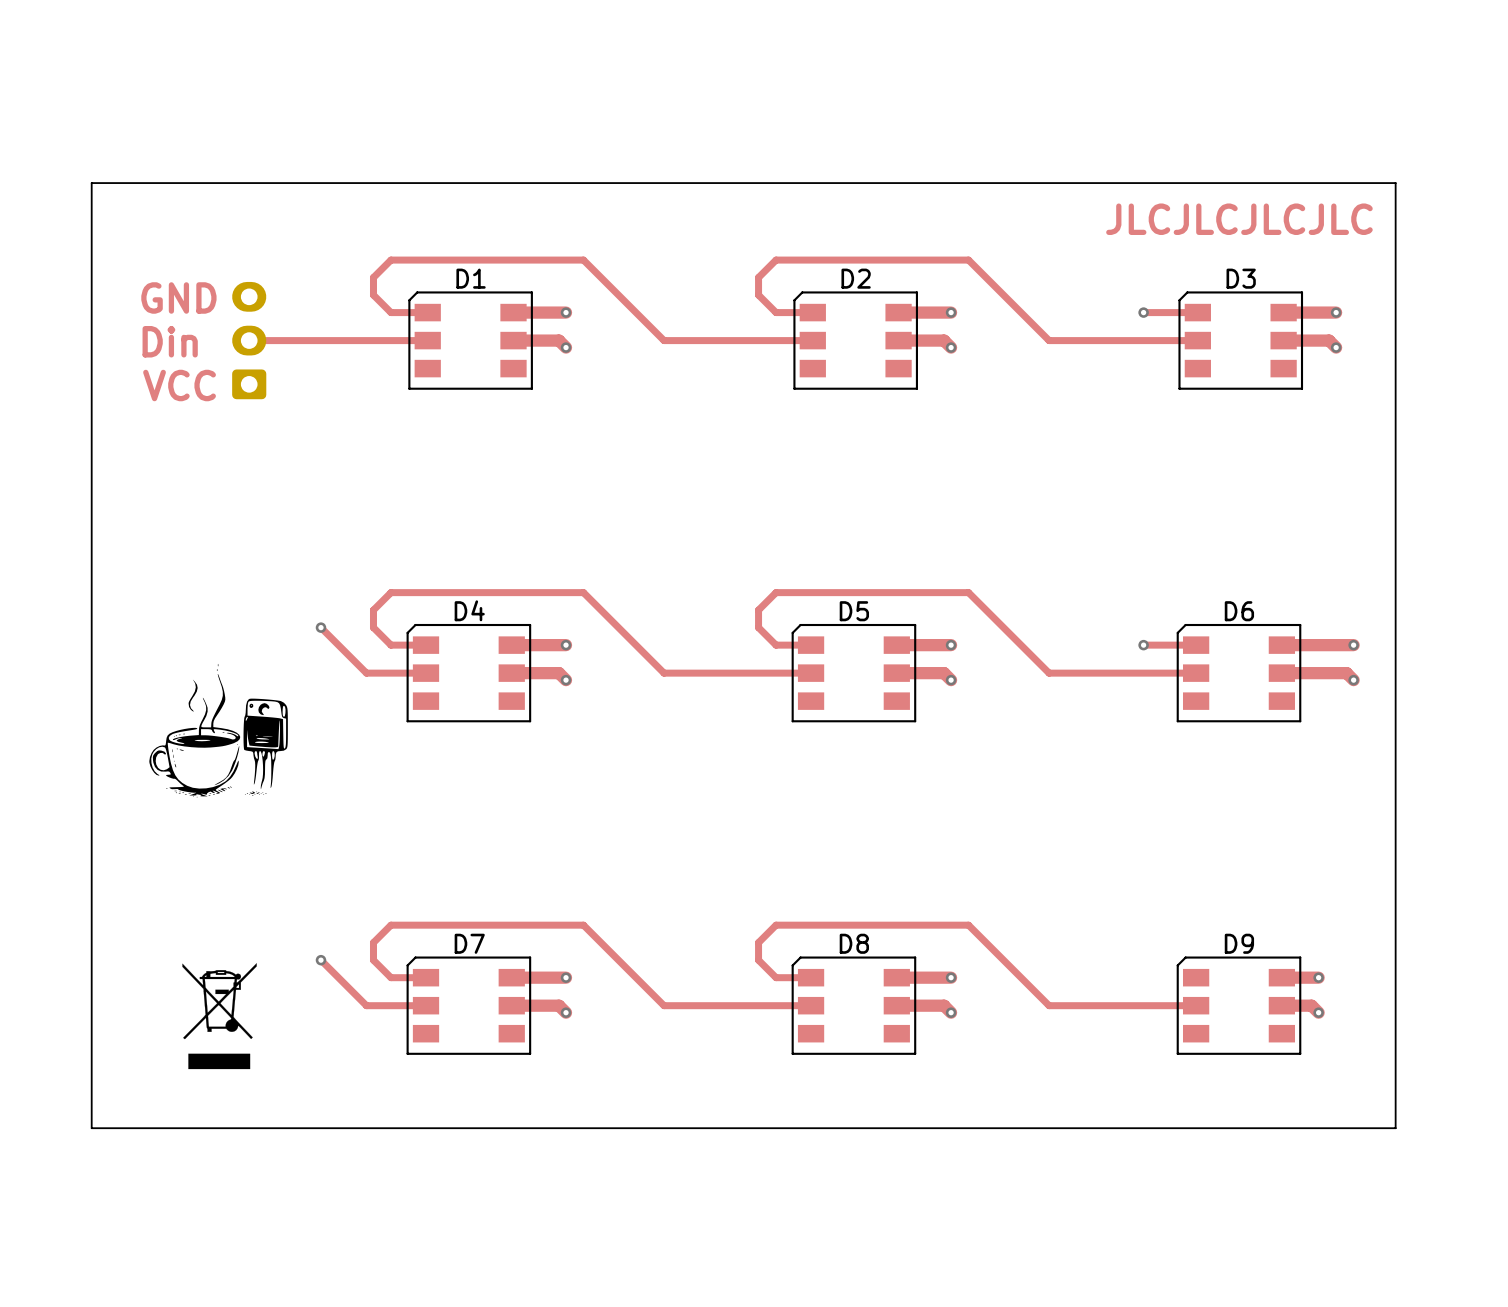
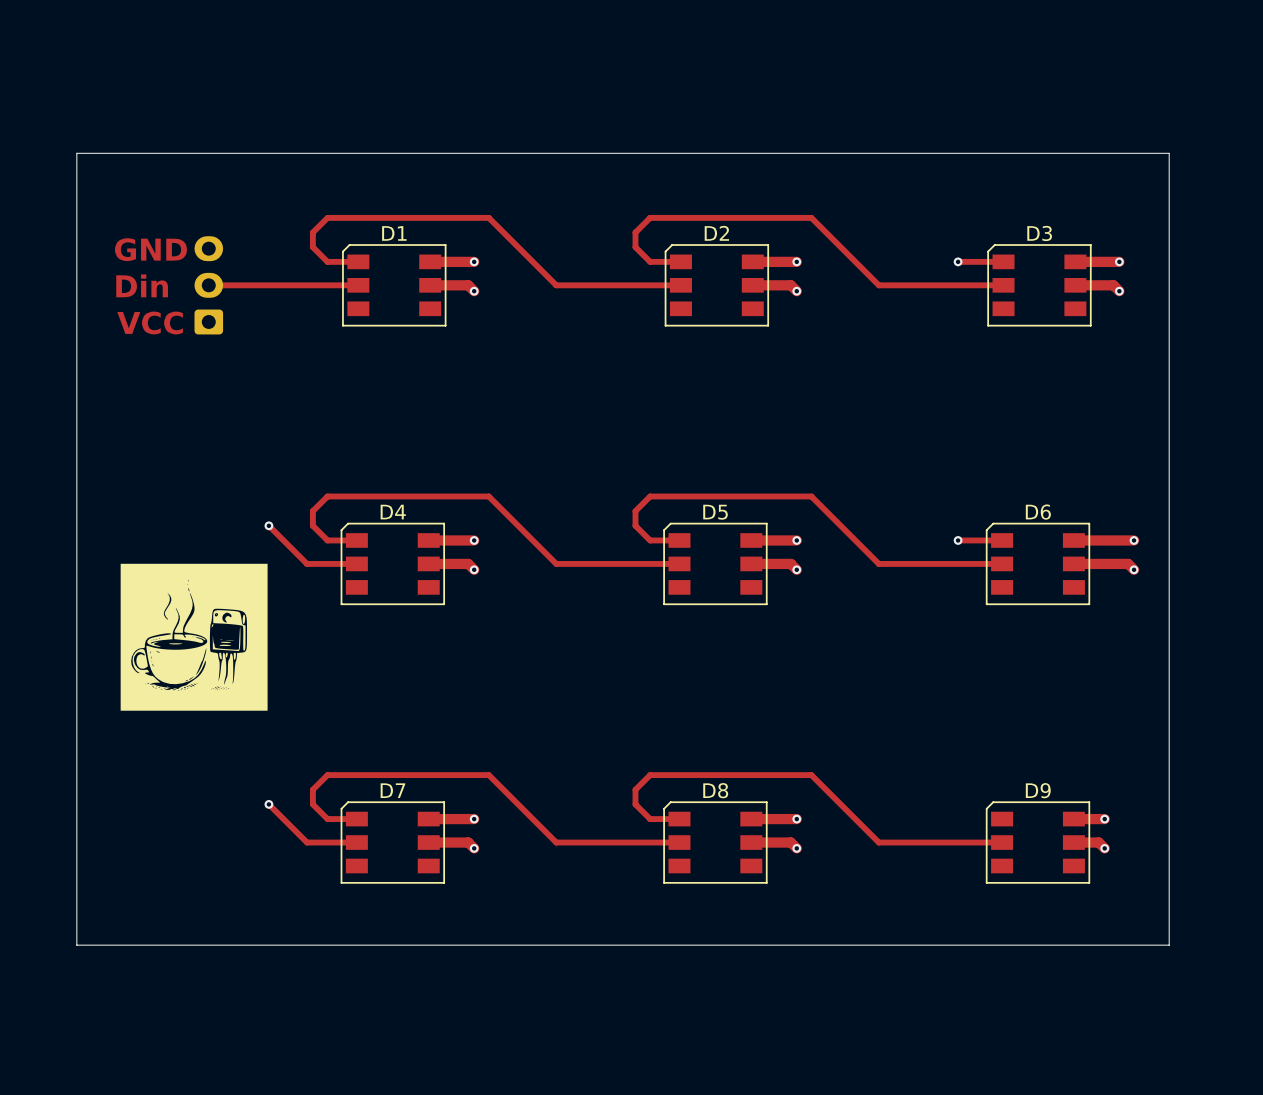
text: JLCJLCJLCJLC (1239, 219) -> none
drawing: [149, 663, 288, 798] -> none
drawing: none -> [120, 563, 268, 711]
drawing: [182, 963, 257, 1070] -> none

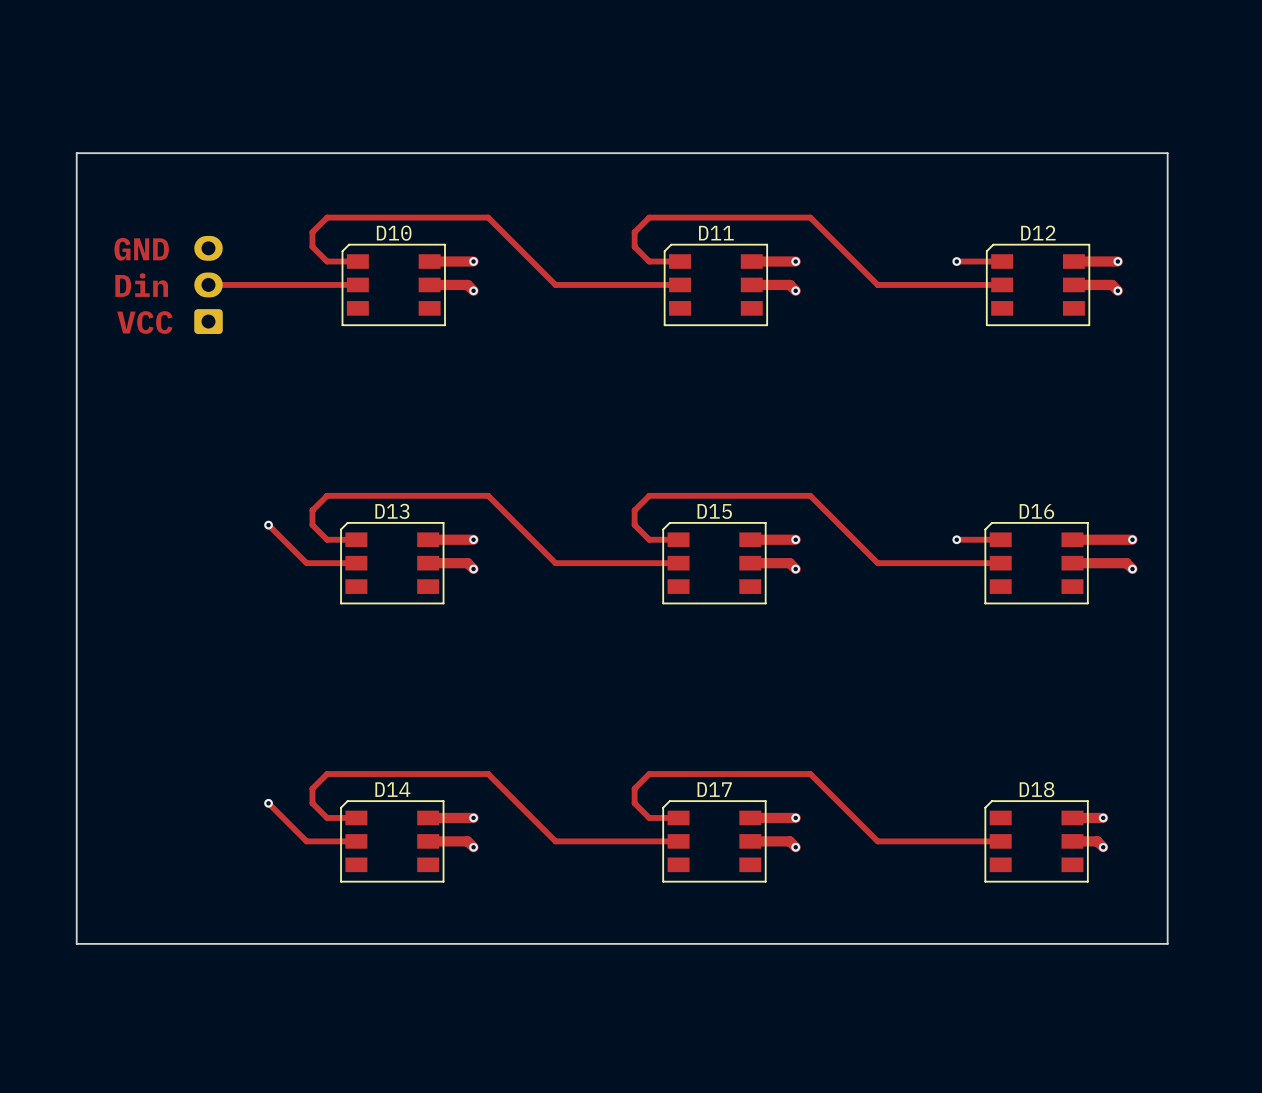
D1 name: D1 (394, 233) -> D10 (394, 233)
D2 name: D2 (716, 233) -> D11 (716, 233)
D3 name: D3 (1039, 233) -> D12 (1038, 233)
D4 name: D4 (393, 512) -> D13 (392, 511)
D5 name: D5 (715, 512) -> D15 (714, 511)
D6 name: D6 (1038, 512) -> D16 (1036, 511)
drawing: [120, 563, 268, 711] -> none
D7 name: D7 (392, 790) -> D14 (392, 789)
D8 name: D8 (715, 790) -> D17 (714, 789)
D9 name: D9 (1038, 790) -> D18 (1037, 789)

